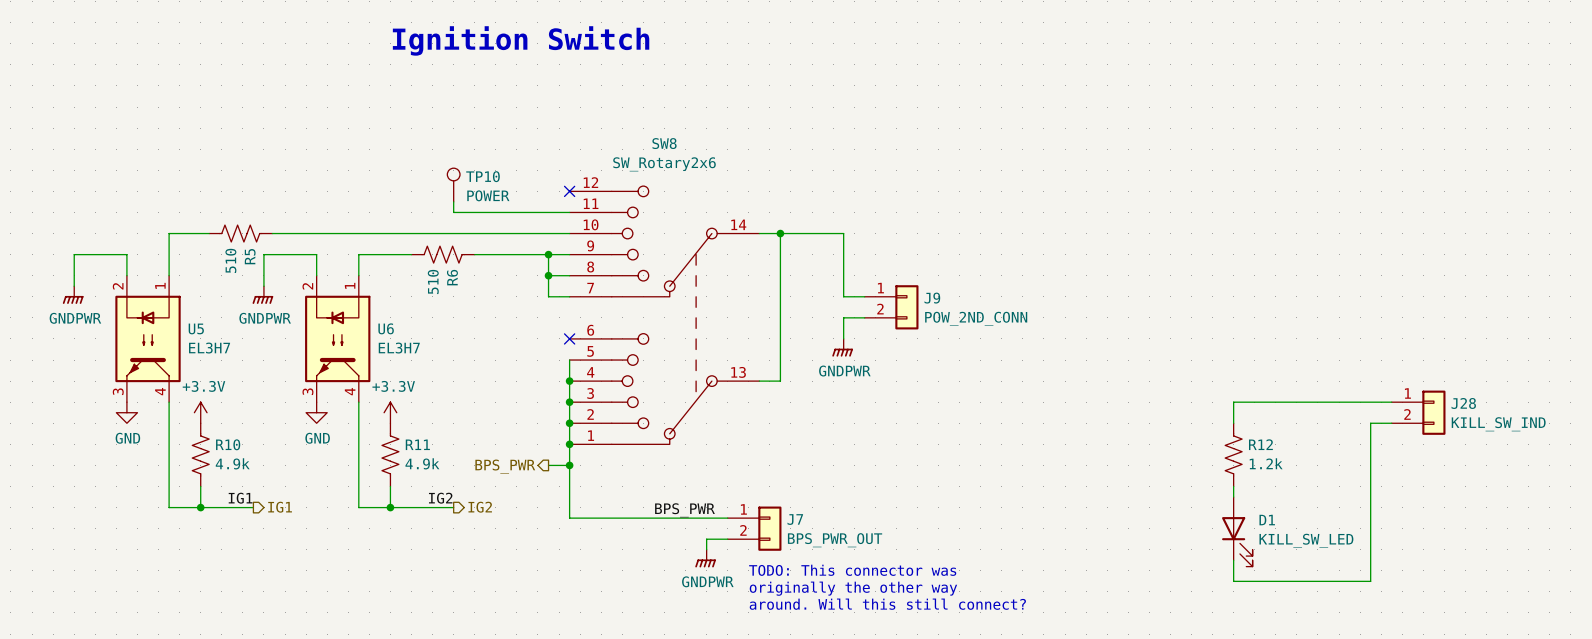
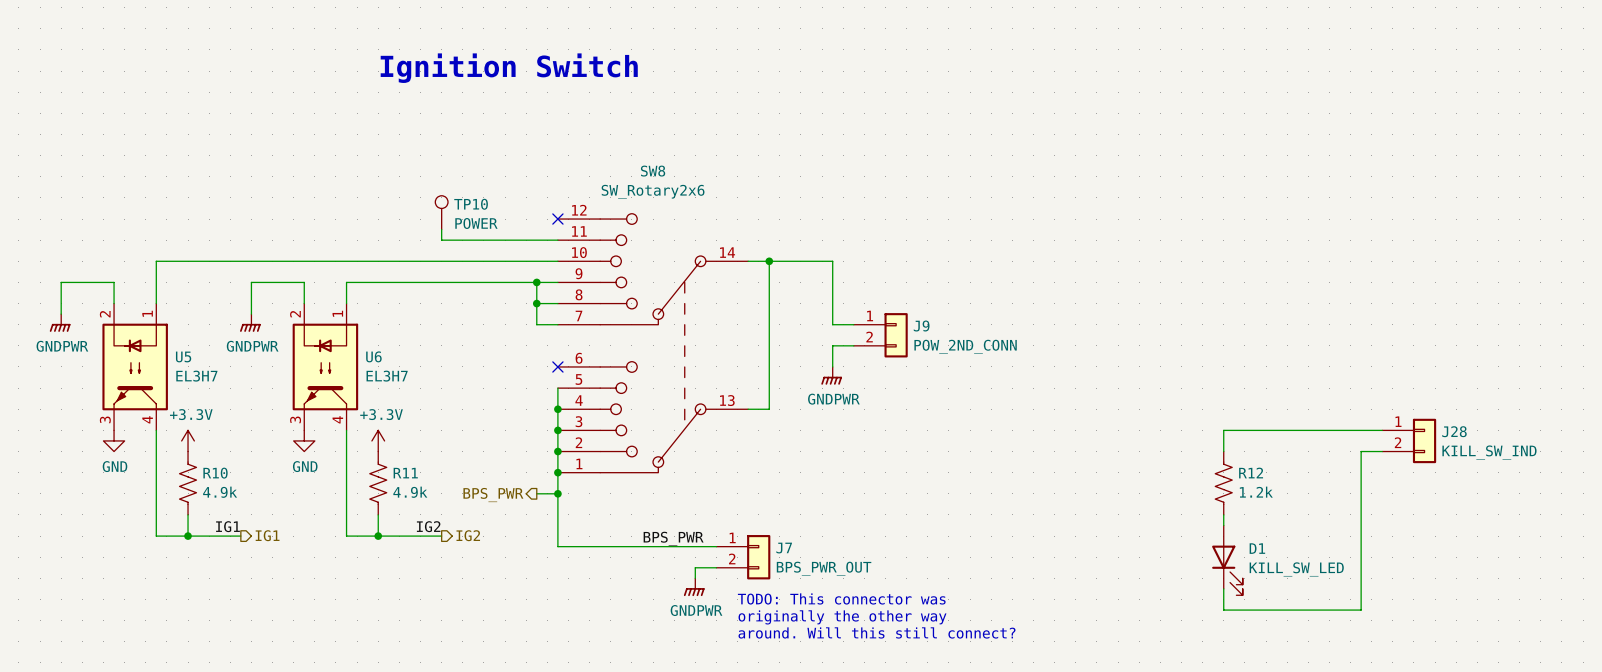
R5: 510 (240, 233) -> none
R6: 510 (443, 254) -> none

